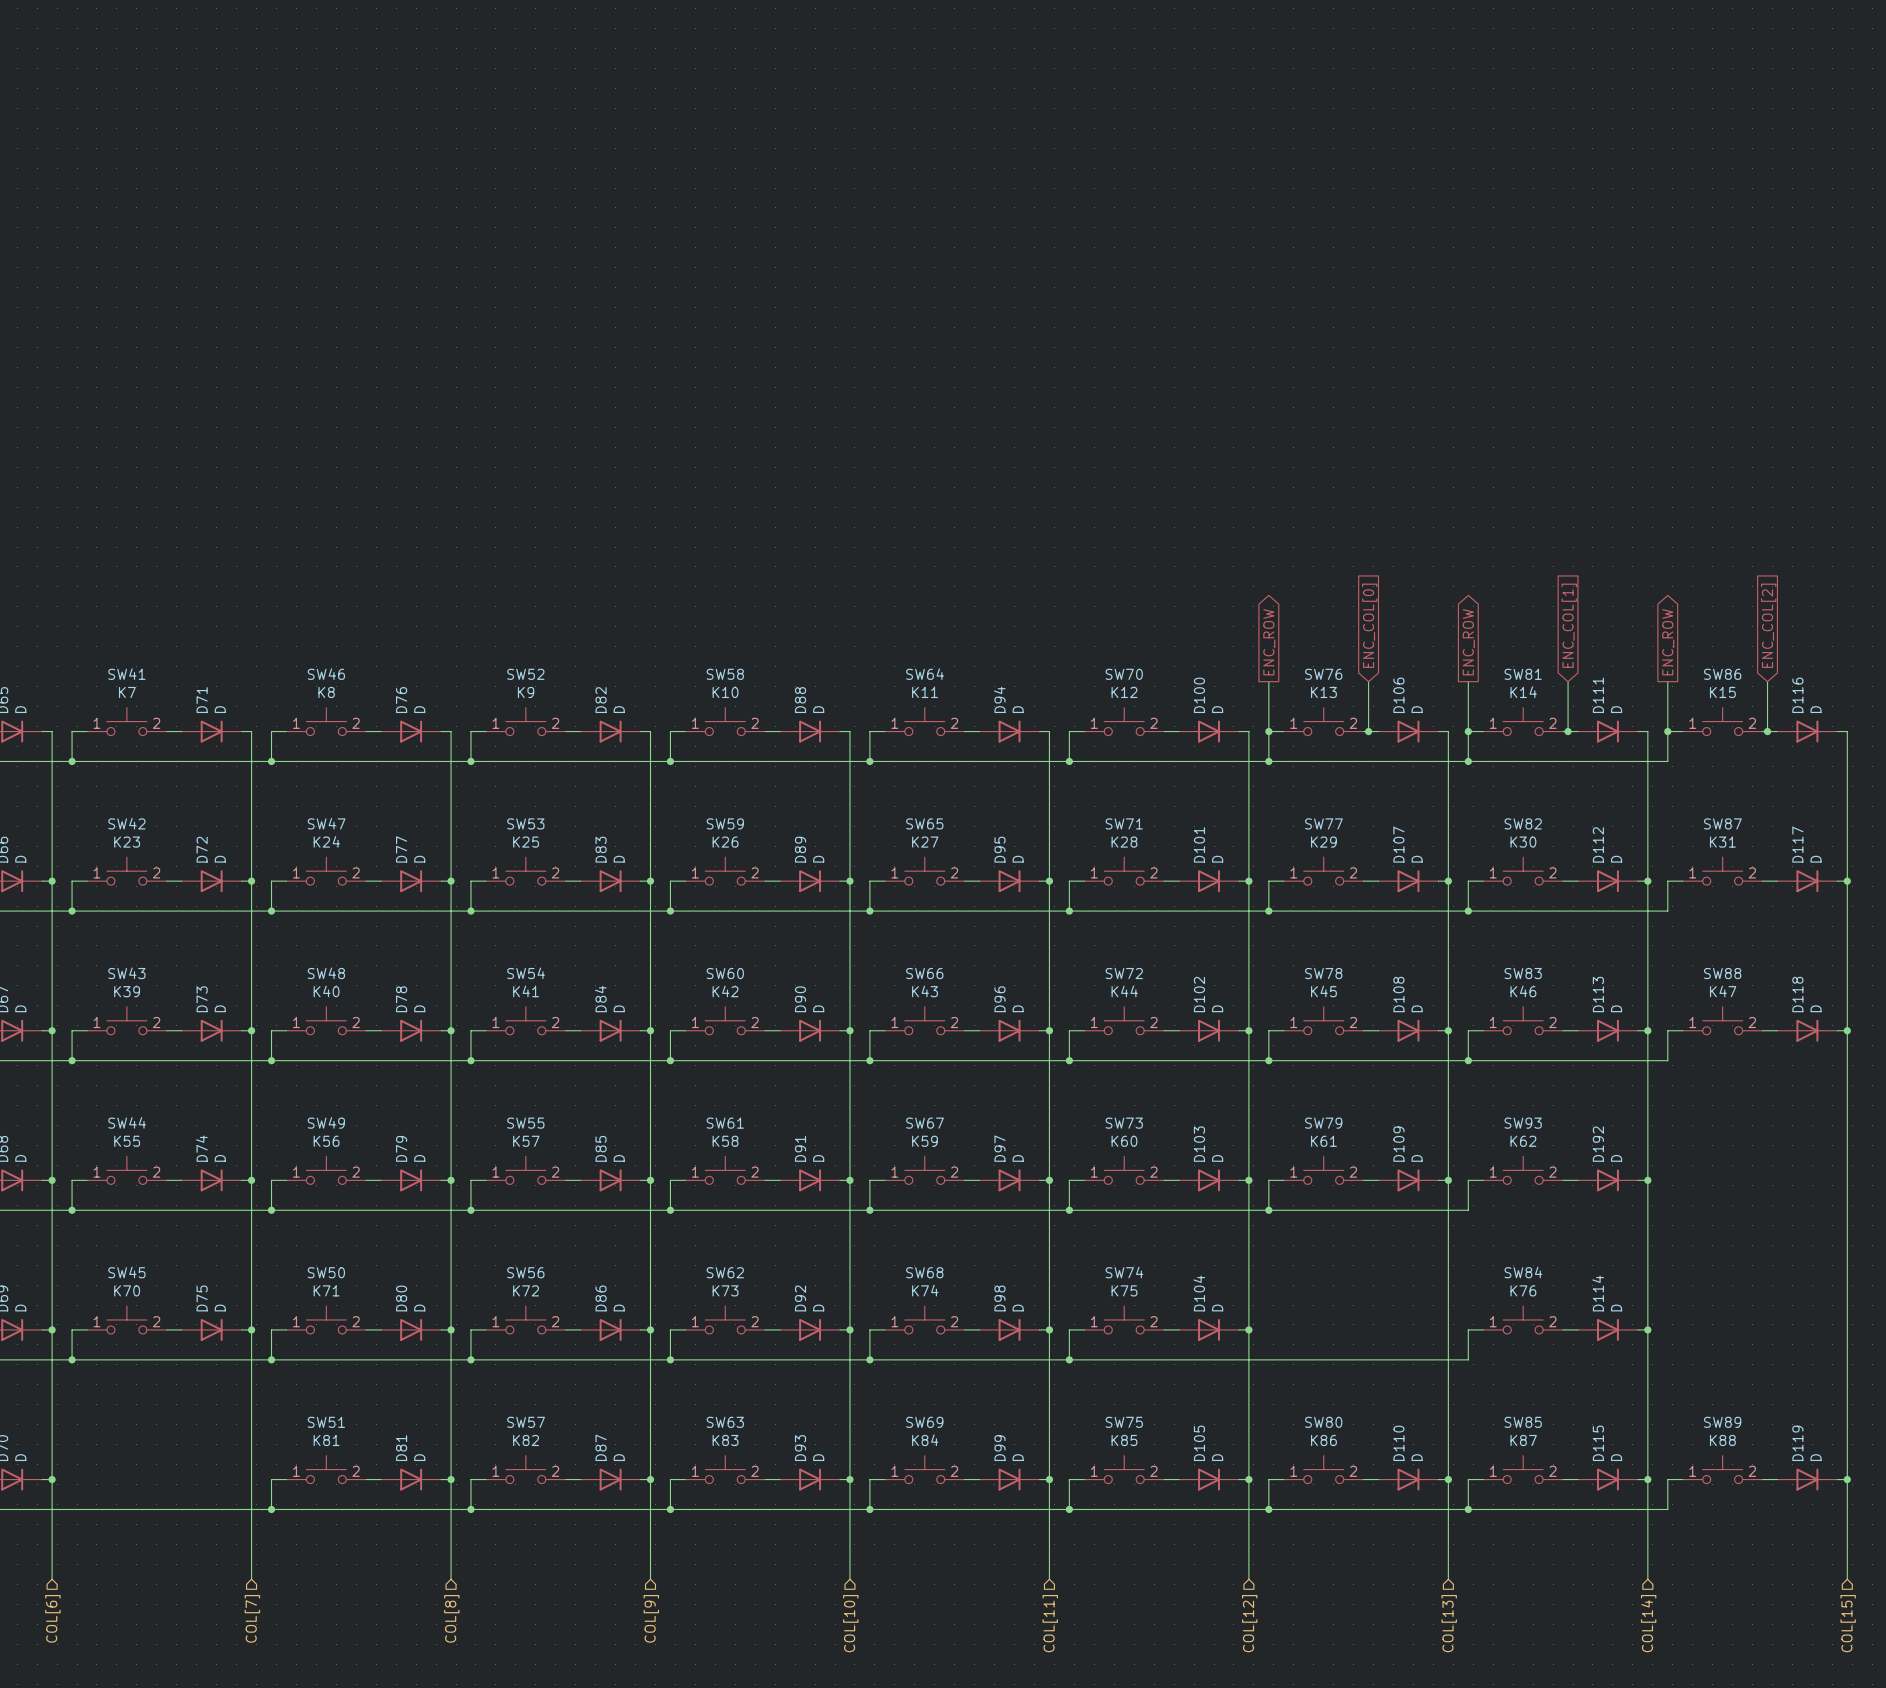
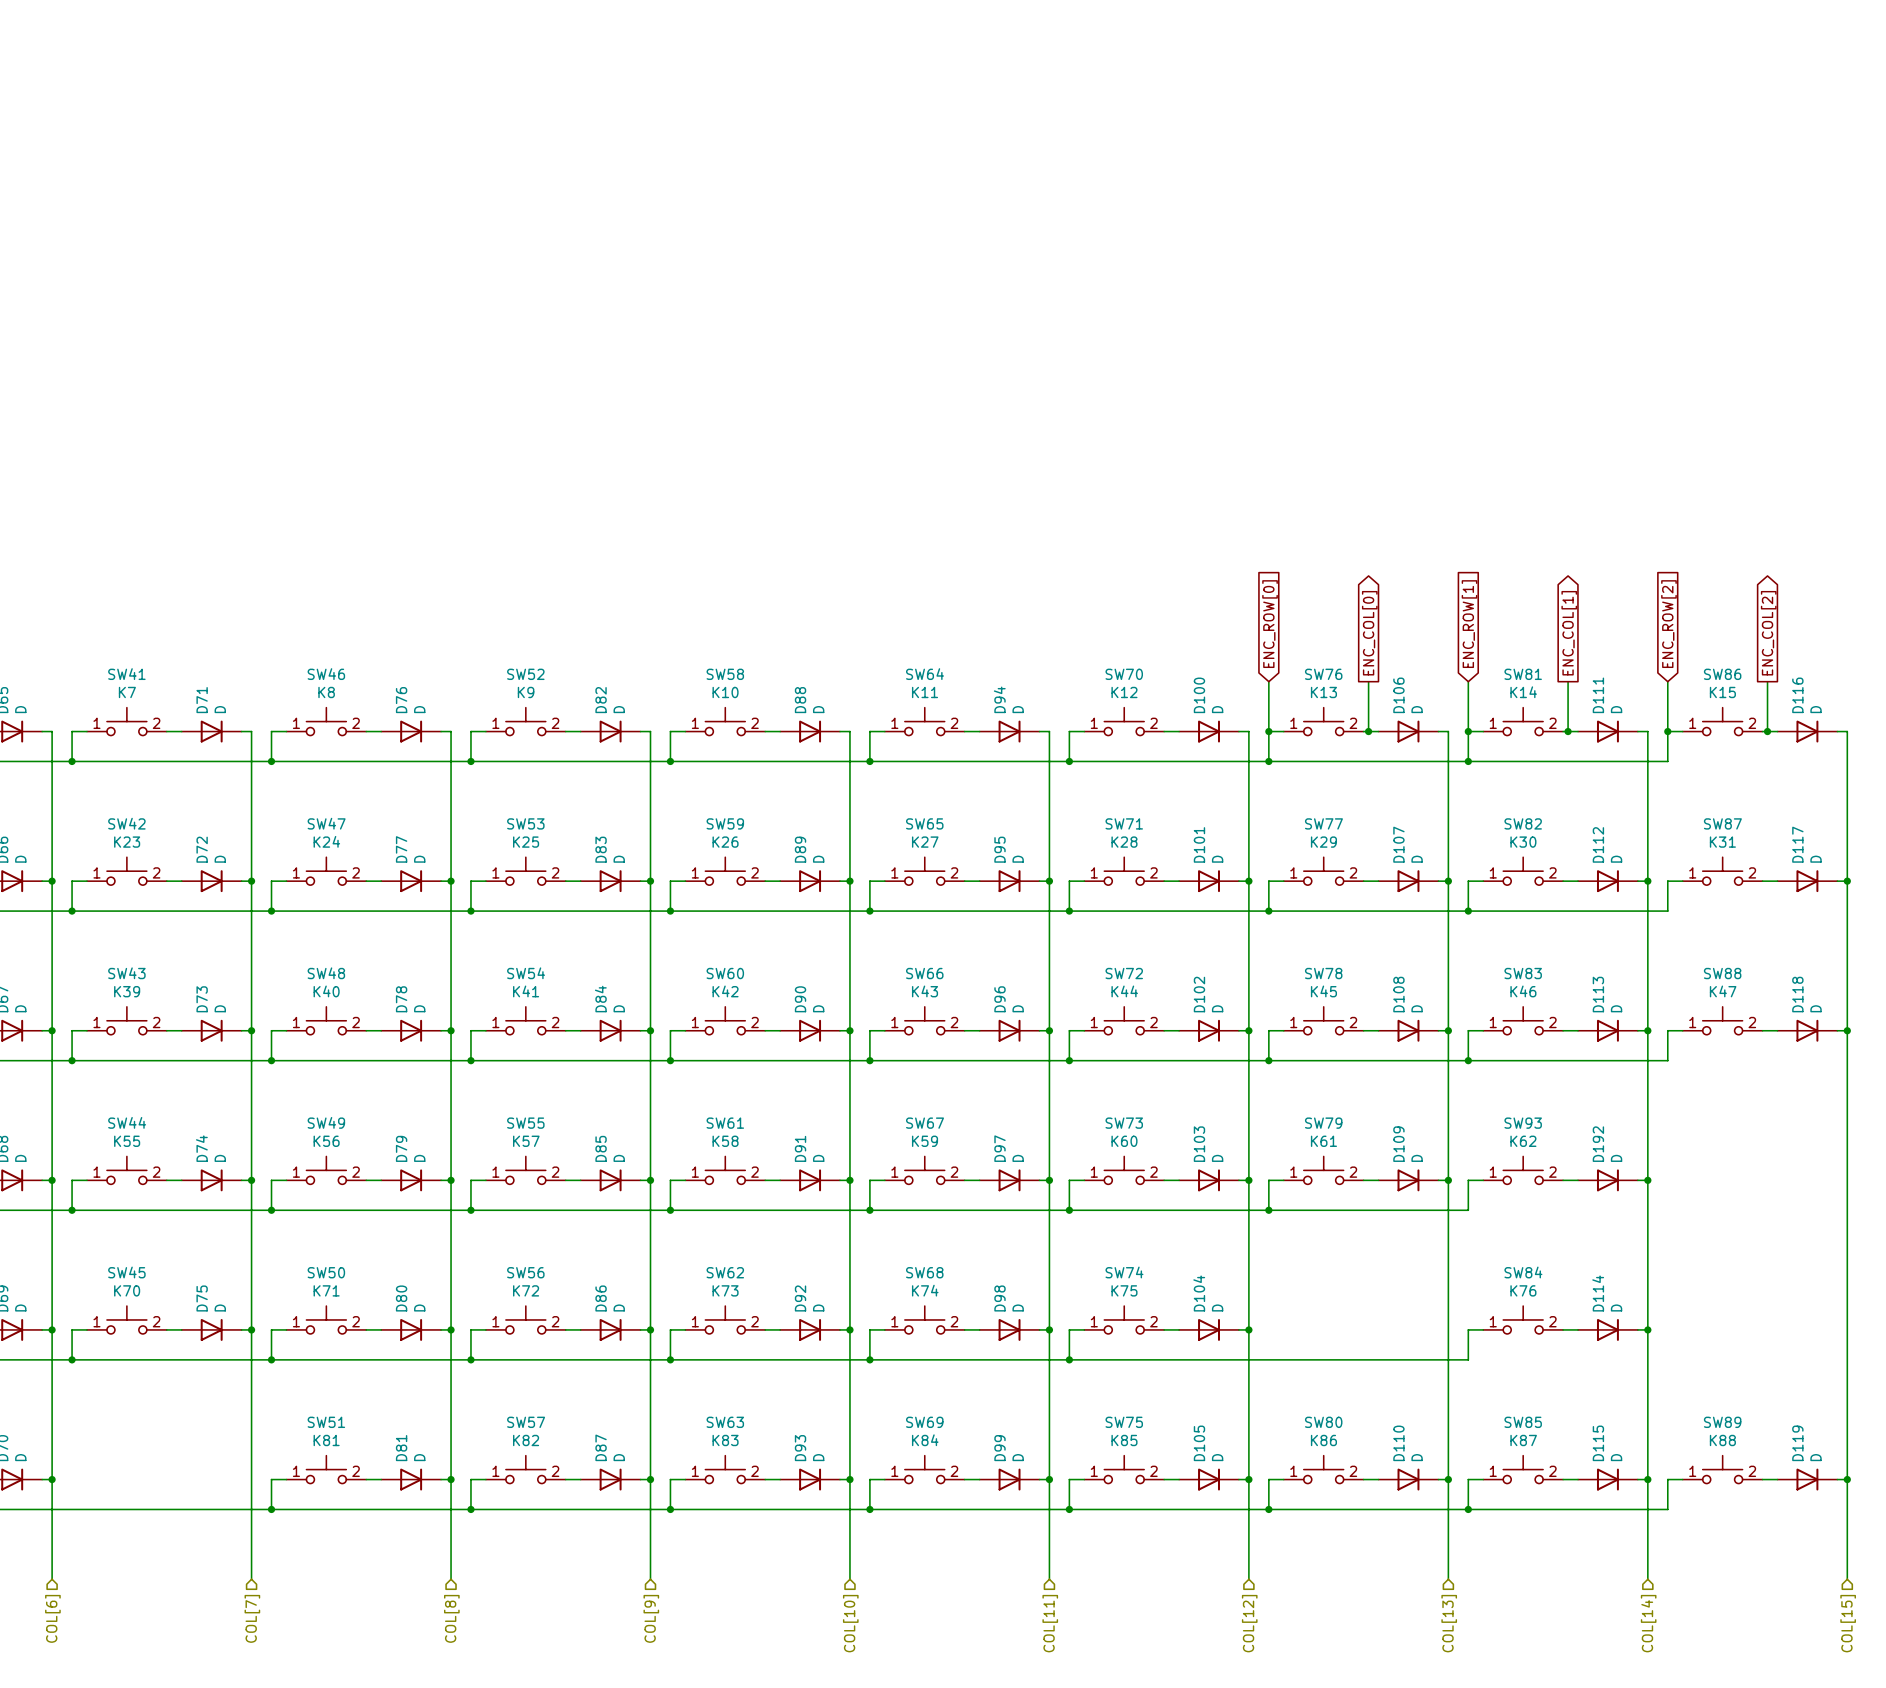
global label shape: input (1369, 625) -> output (1369, 633)
global label shape: input (1569, 625) -> output (1569, 633)
global label shape: input (1768, 625) -> output (1768, 633)
global label shape: output (1269, 642) -> input (1270, 624)
global label: ENC_ROW (1269, 642) -> ENC_ROW[0] (1270, 624)
global label shape: output (1468, 642) -> input (1469, 624)
global label: ENC_ROW (1468, 642) -> ENC_ROW[1] (1469, 624)
global label shape: output (1668, 642) -> input (1668, 624)
global label: ENC_ROW (1668, 642) -> ENC_ROW[2] (1668, 624)

